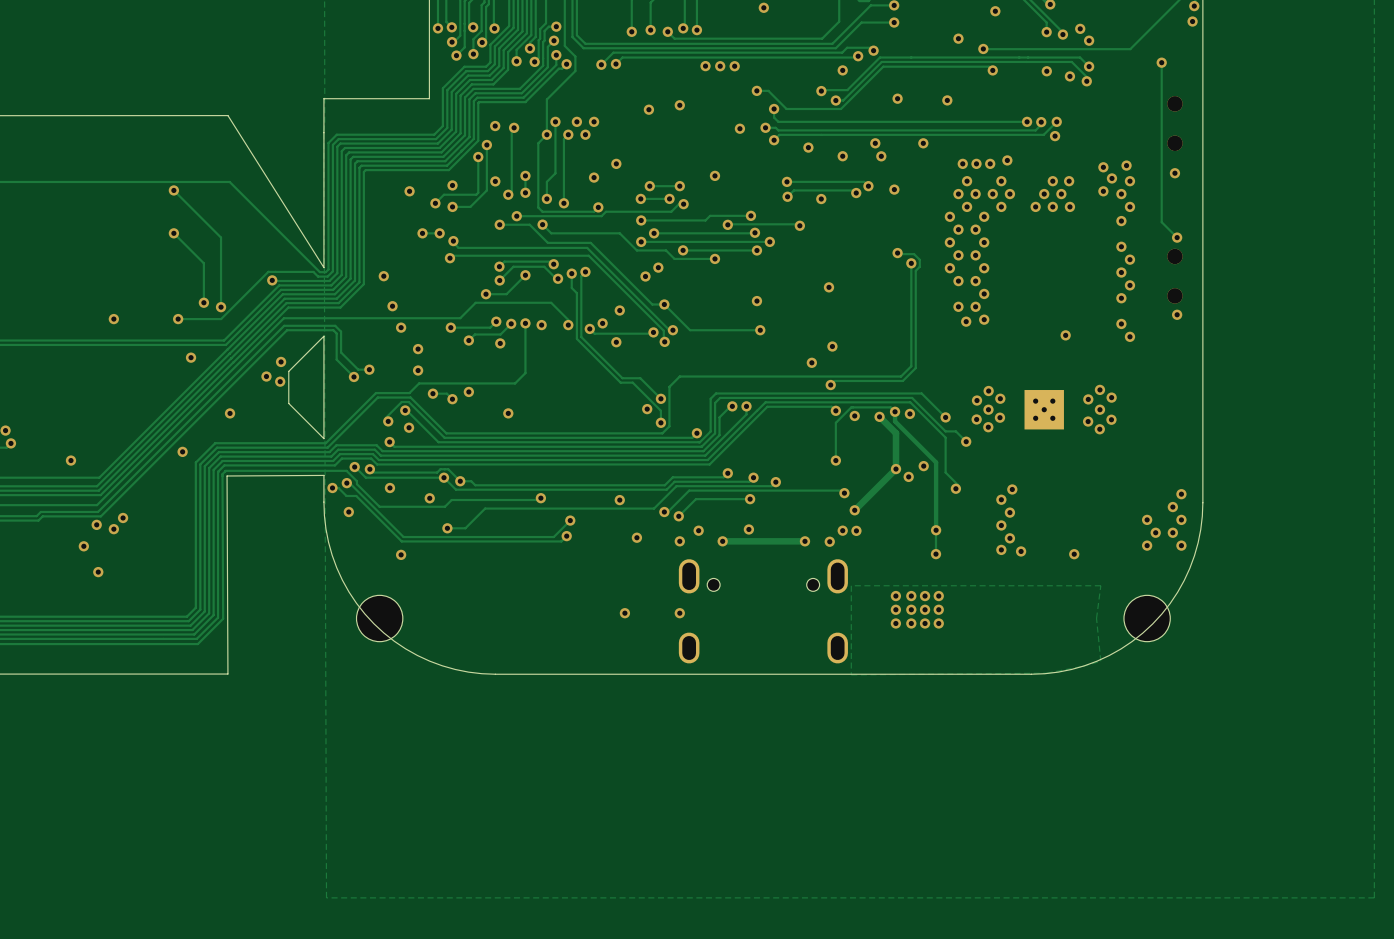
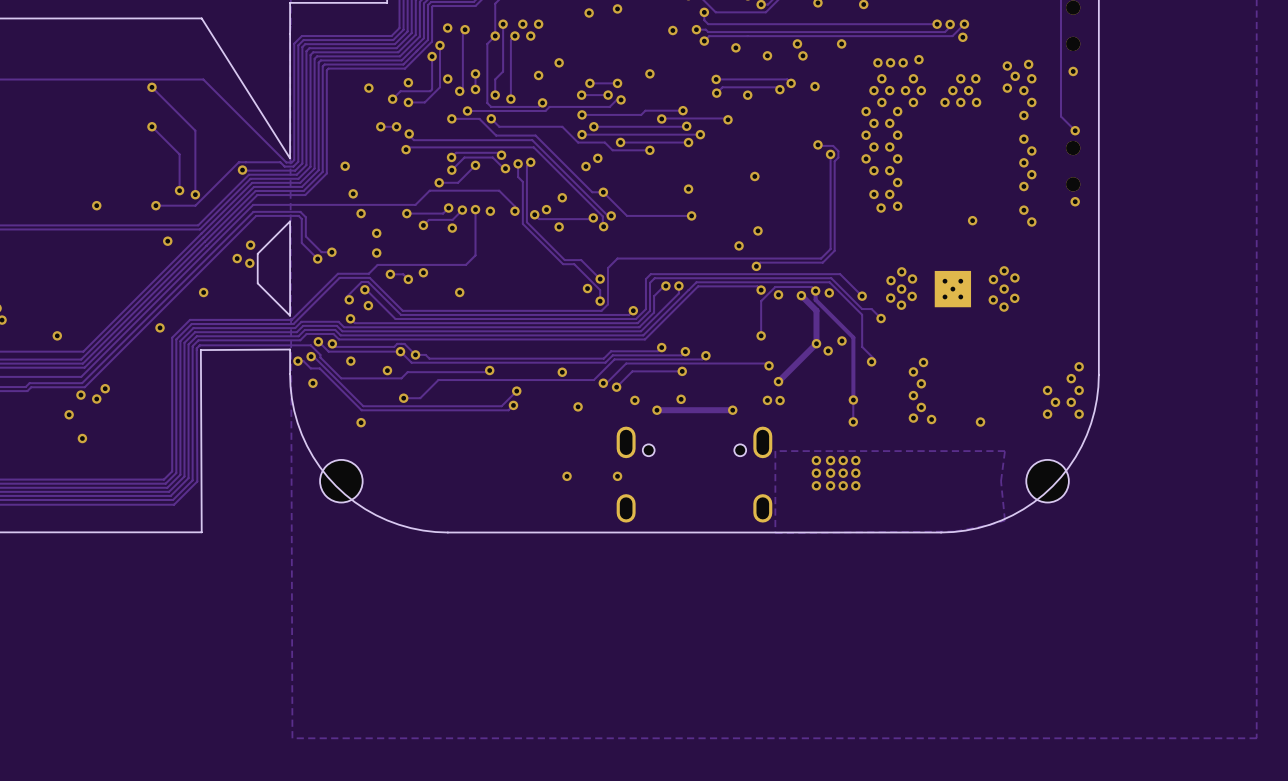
via: (679, 541) -> none
via: (829, 541) -> none

